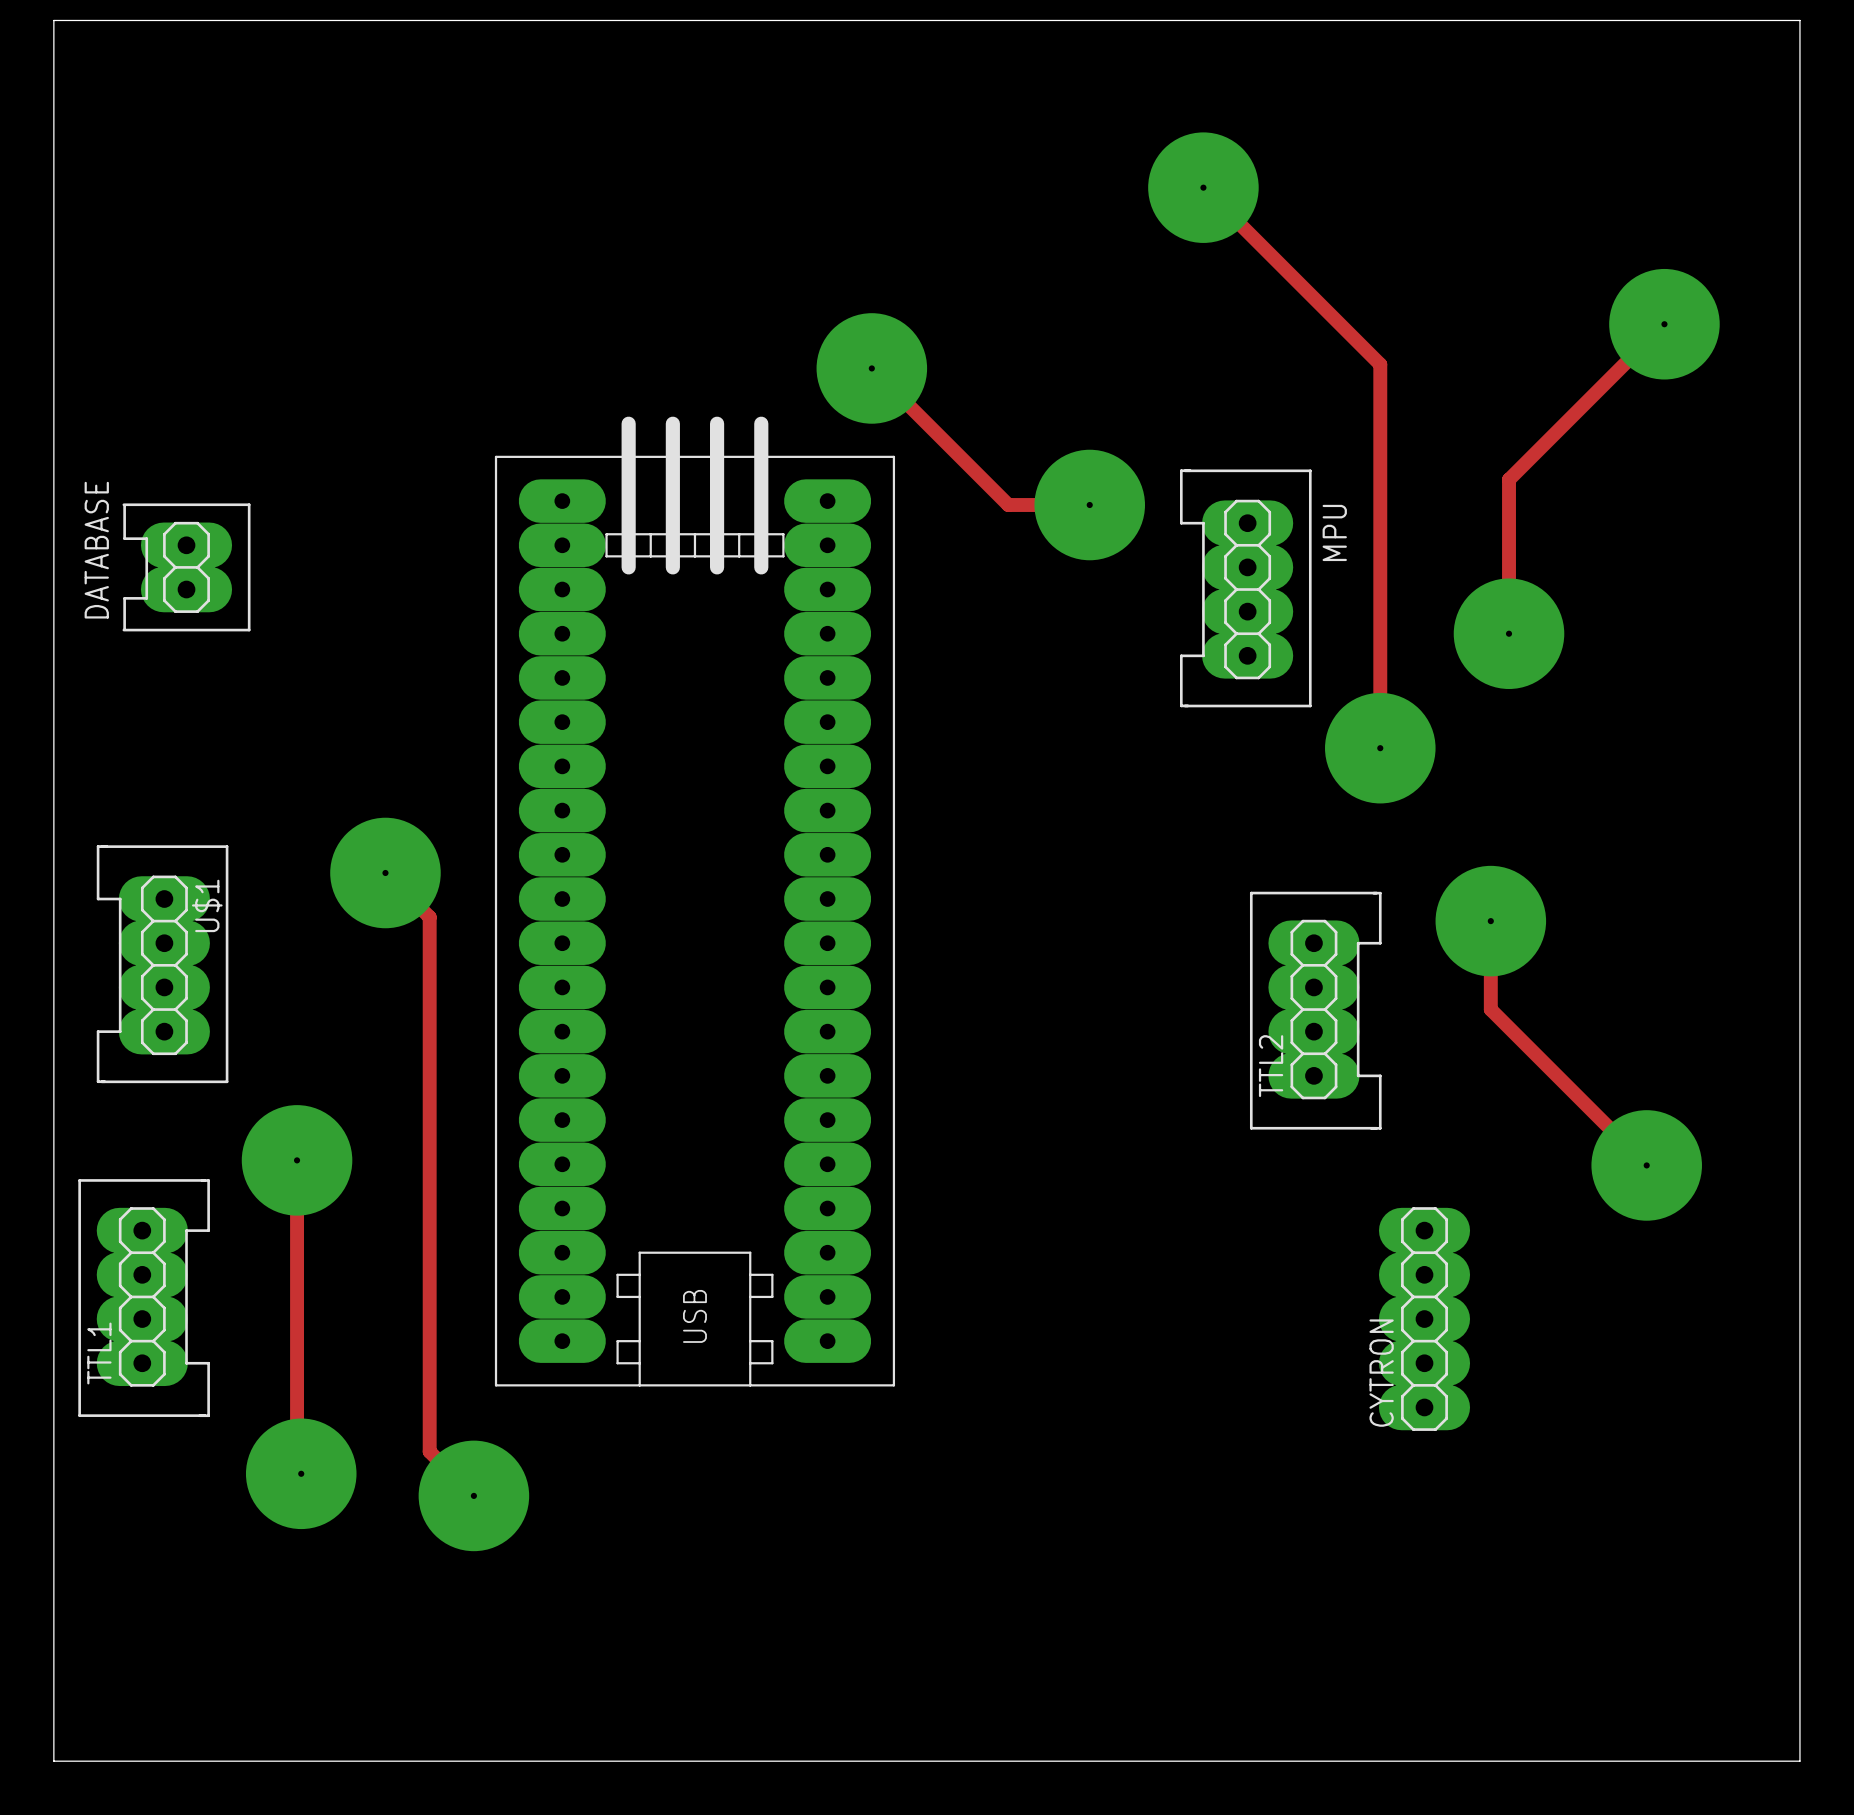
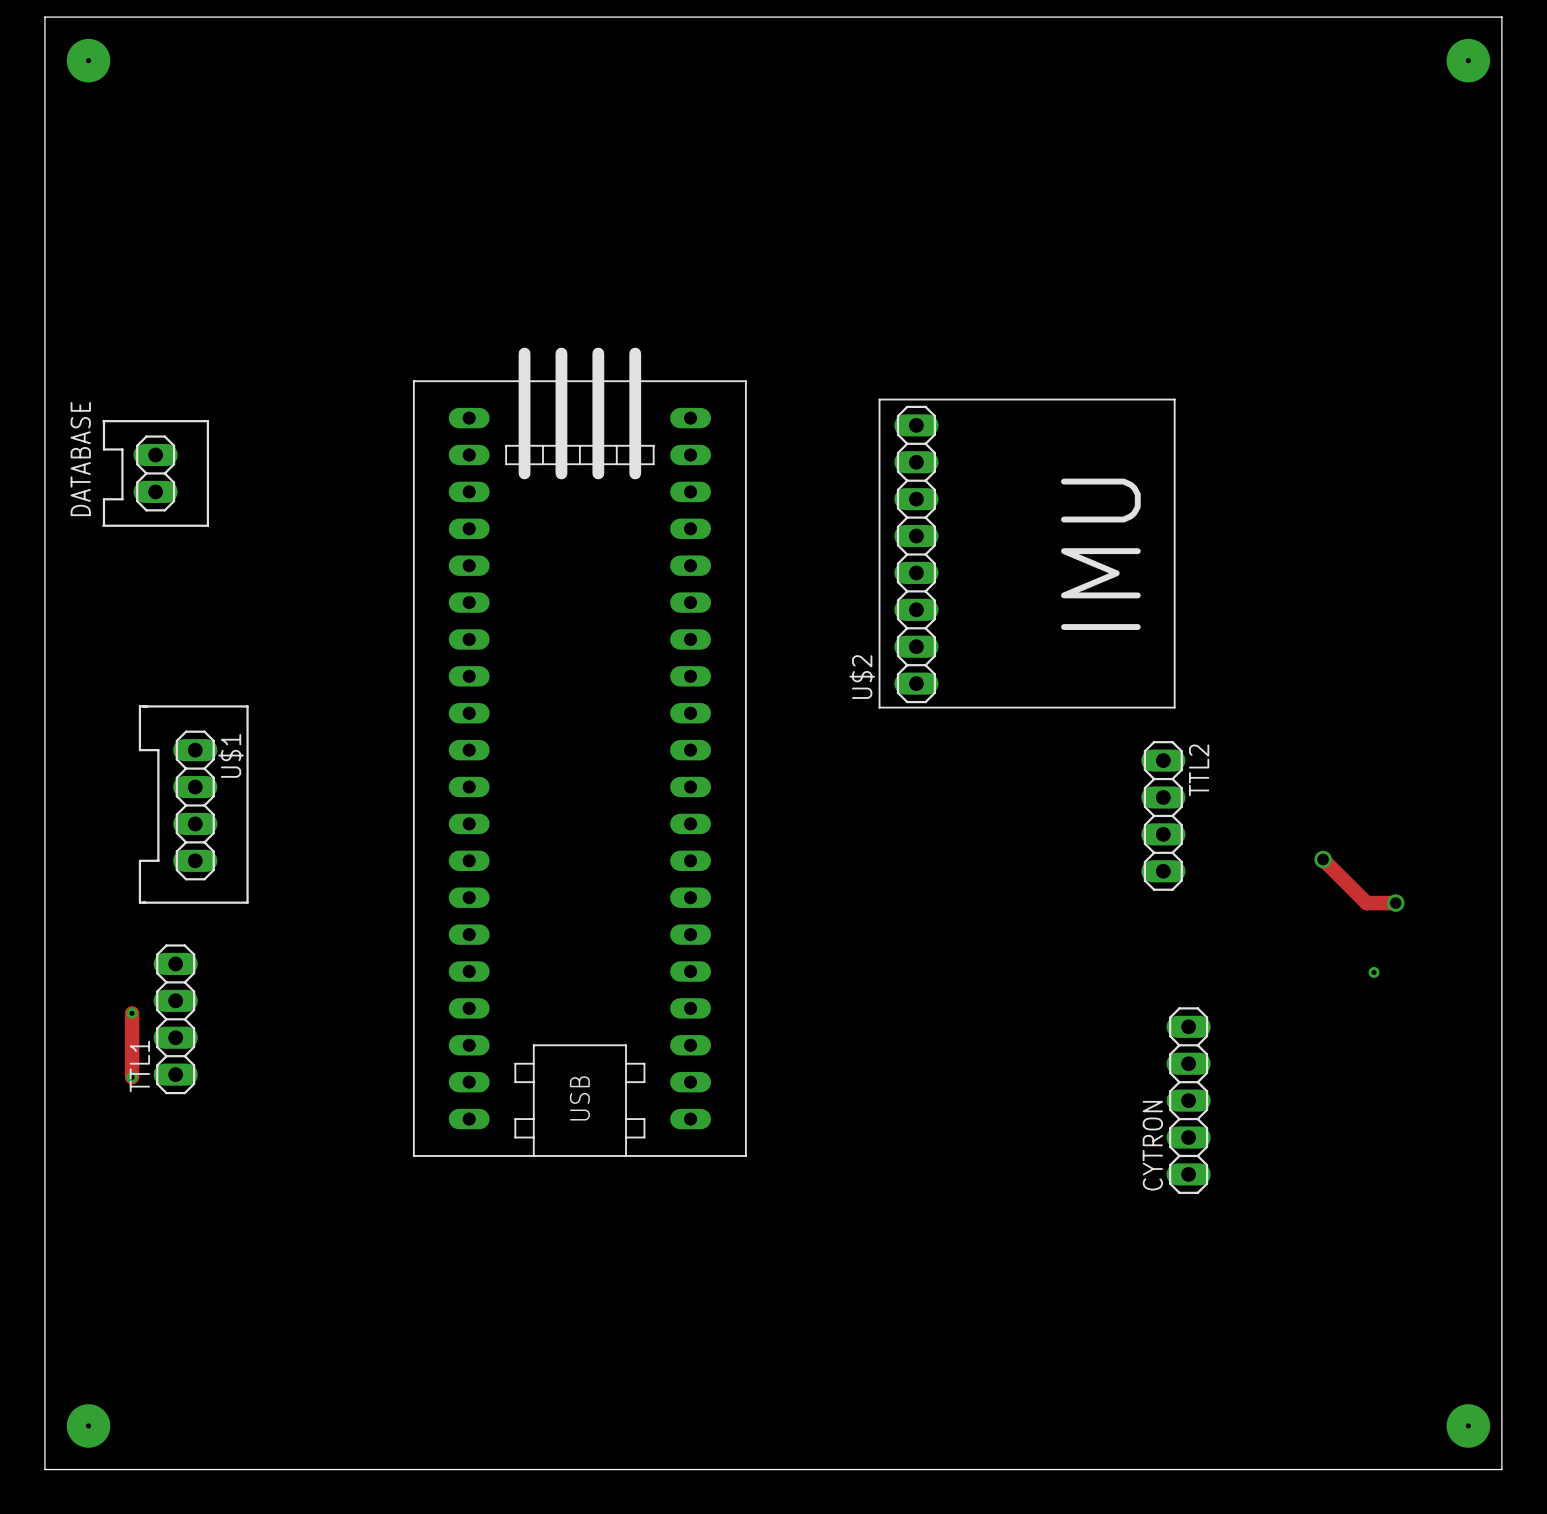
via: none -> (88, 60)
via: none -> (1468, 60)
track: (1203, 187) (1380, 364) (1380, 748) -> none
via: (1203, 187) -> none
track: (1664, 324) (1509, 479) (1509, 633) -> none
via: (1664, 324) -> none
track: (871, 368) (1008, 505) (1089, 505) -> none
via: (871, 368) -> none
part footprint: [494, 416, 896, 1387] -> [412, 347, 747, 1157]
DATABASE footprint: [122, 503, 251, 632] -> [102, 420, 210, 527]
via: (1089, 505) -> none
MPU: (1245, 588) -> none
via: (1509, 633) -> none
U$2: none -> (1027, 553)
via: (1380, 748) -> none
U$1 footprint: [96, 845, 229, 1084] -> [138, 705, 249, 904]
track: (385, 872) (429, 917) (429, 1451) (473, 1495) -> none
via: (385, 872) -> none
TTL2 footprint: [1249, 891, 1382, 1130] -> [1141, 741, 1186, 891]
track: (1490, 921) (1490, 1009) (1646, 1165) -> none
via: (1490, 921) -> none
track: none -> (1323, 859) (1366, 903) (1395, 903)
via: none -> (1323, 859)
TTL2 name position: TTL2 (1271, 1066) -> TTL2 (1199, 770)
via: none -> (1395, 903)
via size: [1591, 1110, 1702, 1221] -> [1368, 966, 1380, 978]
track: (297, 1160) (297, 1469) (301, 1473) -> none
via: (297, 1160) -> none
TTL1 footprint: [78, 1179, 210, 1418] -> [153, 944, 198, 1095]
CYTRON footprint: [1378, 1207, 1471, 1431] -> [1166, 1007, 1211, 1194]
track: none -> (132, 1013) (132, 1077)
via: none -> (132, 1013)
via: none -> (132, 1077)
via: (301, 1473) -> none
via: (473, 1495) -> none
via: none -> (88, 1425)
via: none -> (1468, 1425)

